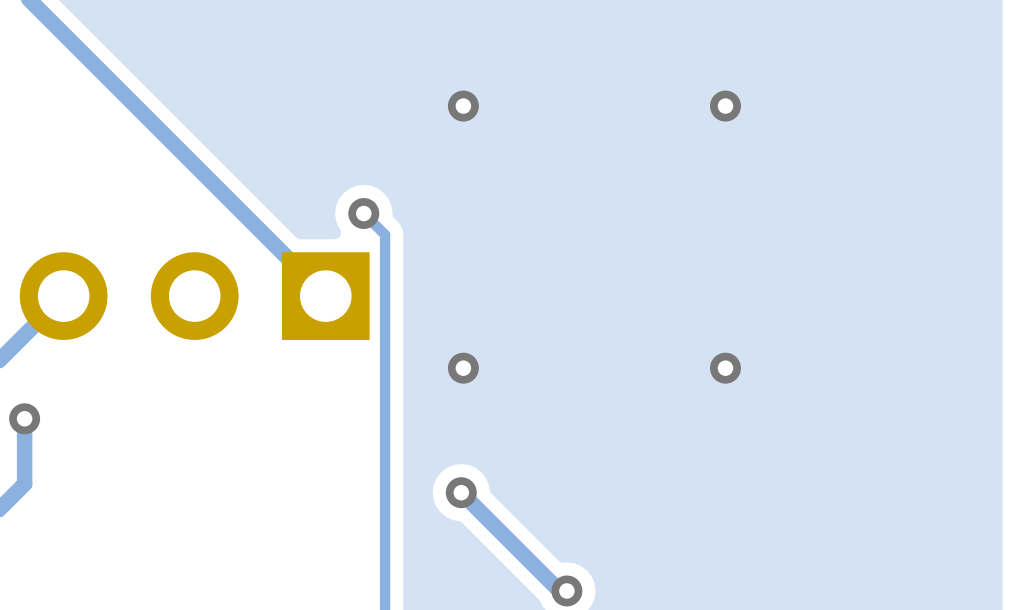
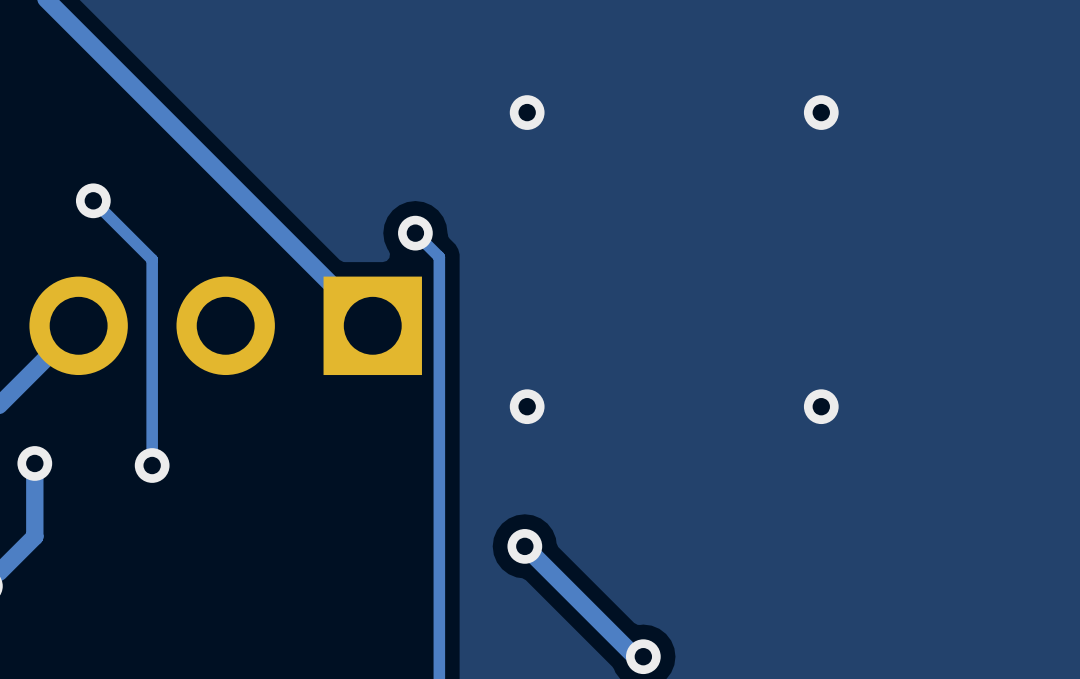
track: none -> (93, 200) (152, 259) (152, 465)
via: none -> (93, 200)
via: none -> (152, 465)

